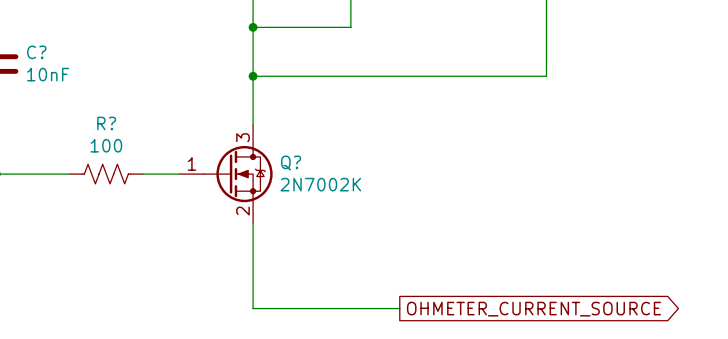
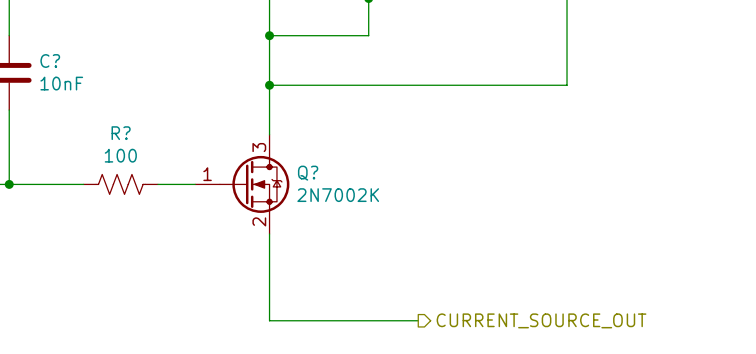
hierarchical label: none -> CURRENT_SOURCE_OUT (541, 320)
global label: OHMETER_CURRENT_SOURCE (533, 309) -> none

